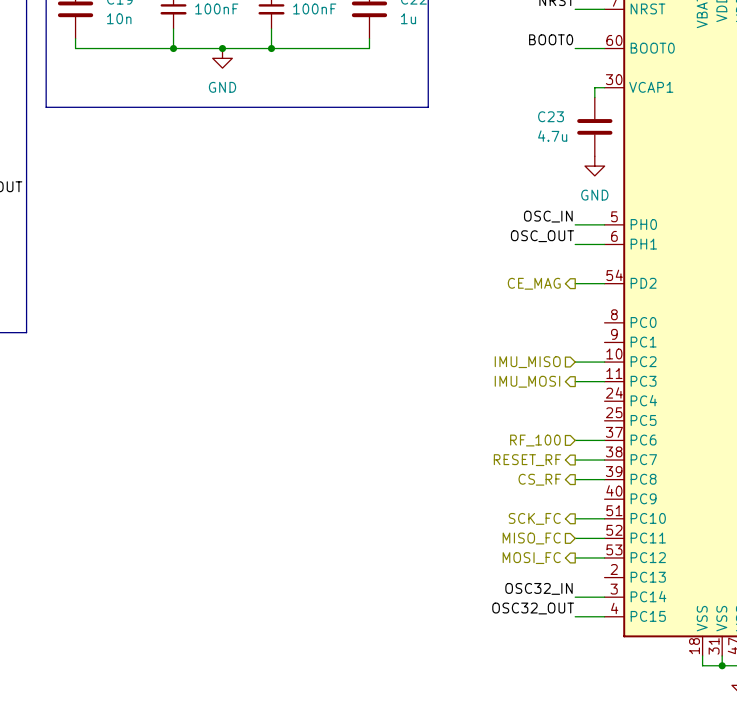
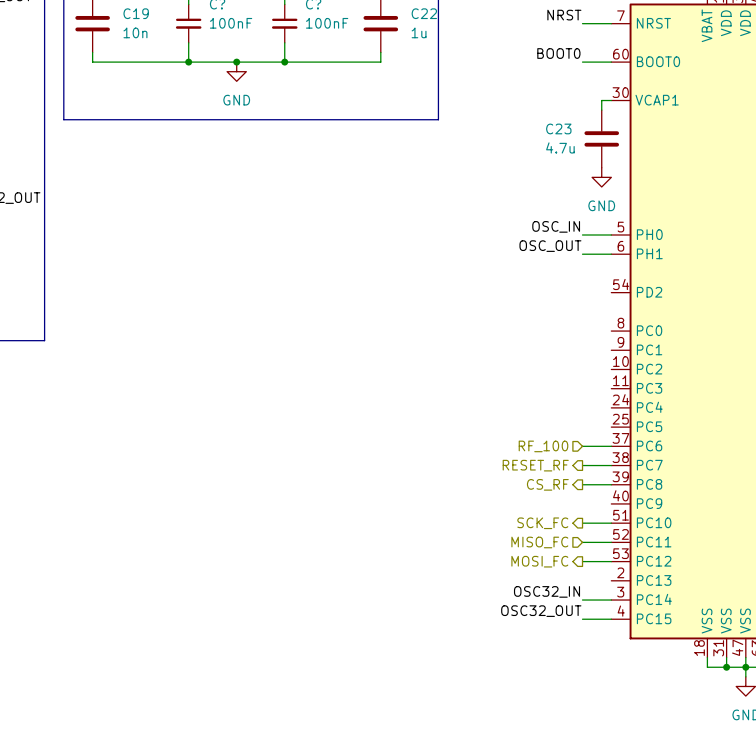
hierarchical label: CE_MAG (534, 283) -> none
wire: (575, 283) (604, 283) -> none
hierarchical label: IMU_MISO (527, 362) -> none
wire: (575, 362) (604, 362) -> none
hierarchical label: IMU_MOSI (527, 381) -> none
wire: (575, 381) (604, 381) -> none

